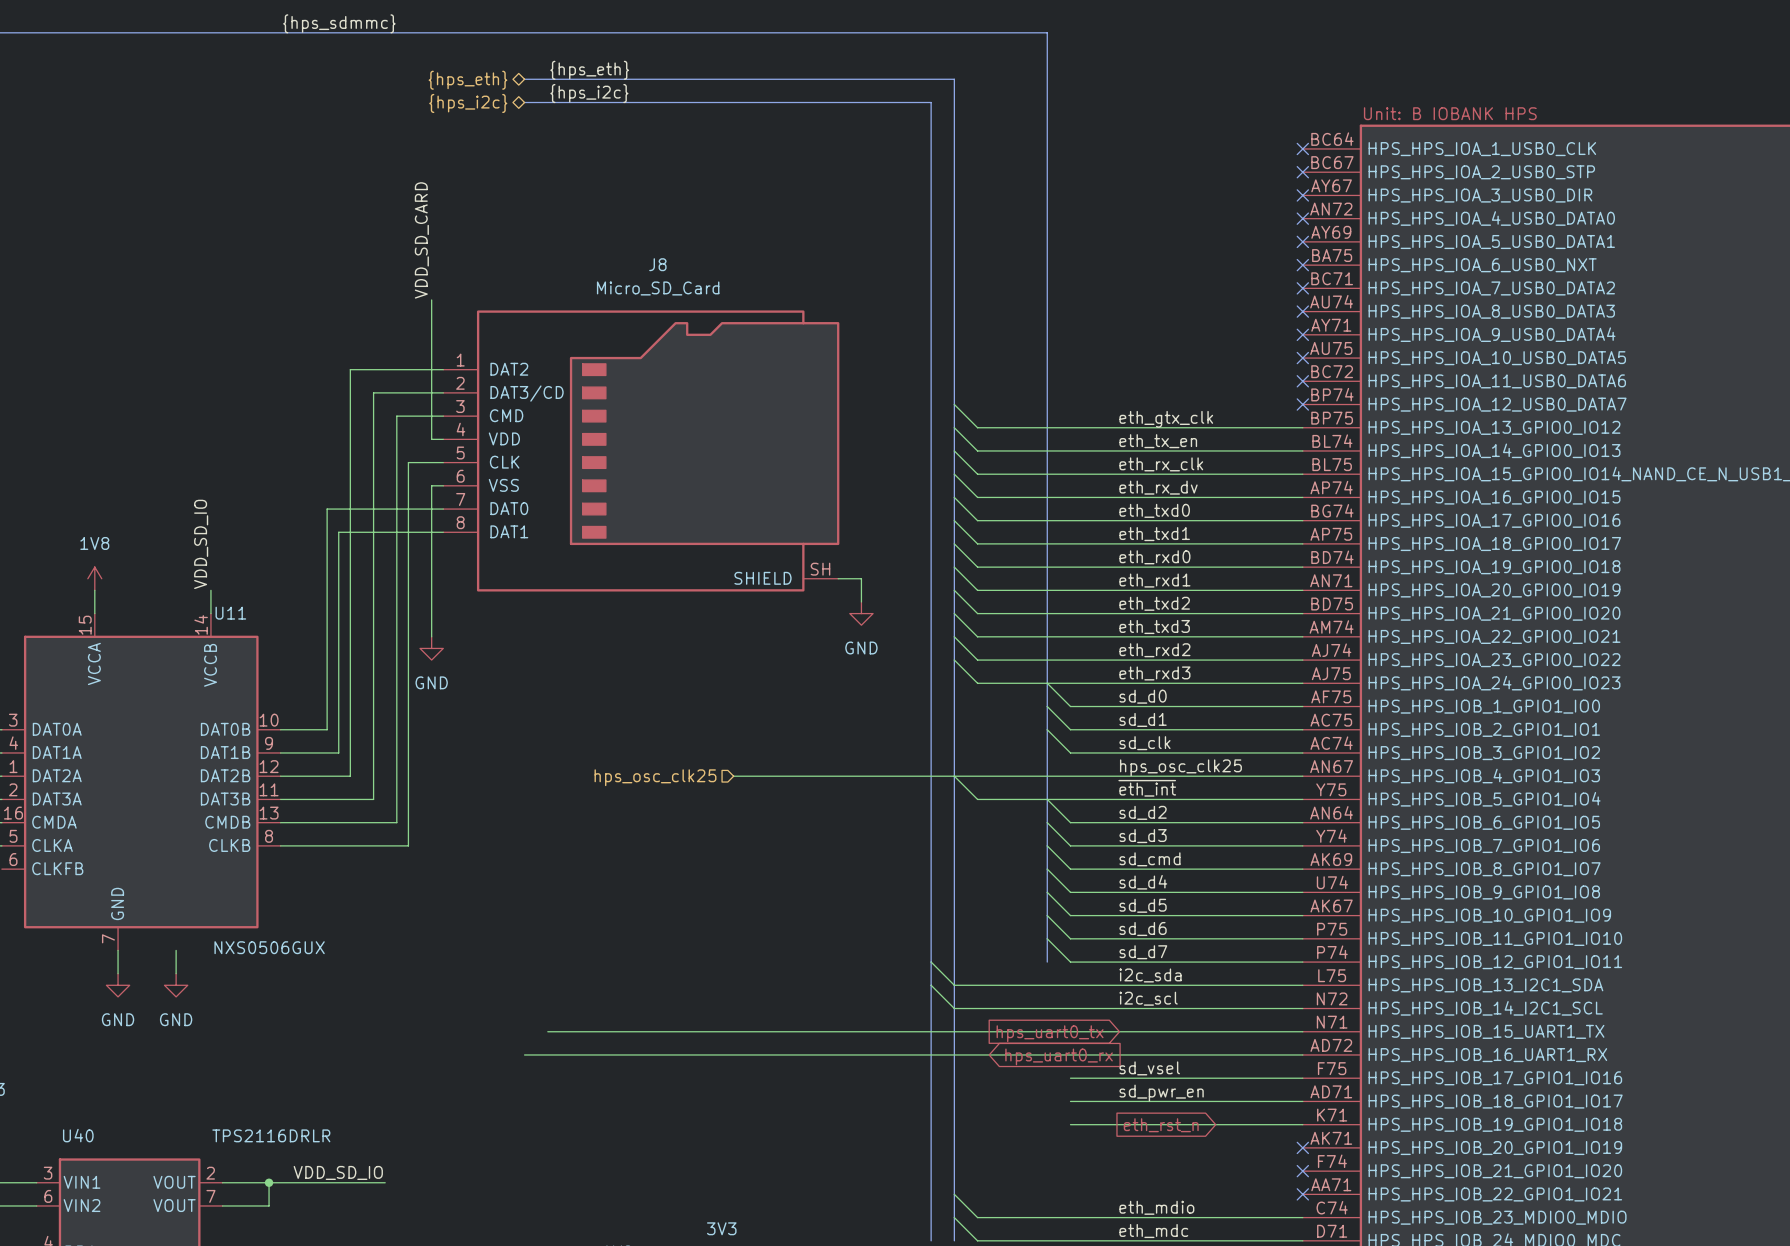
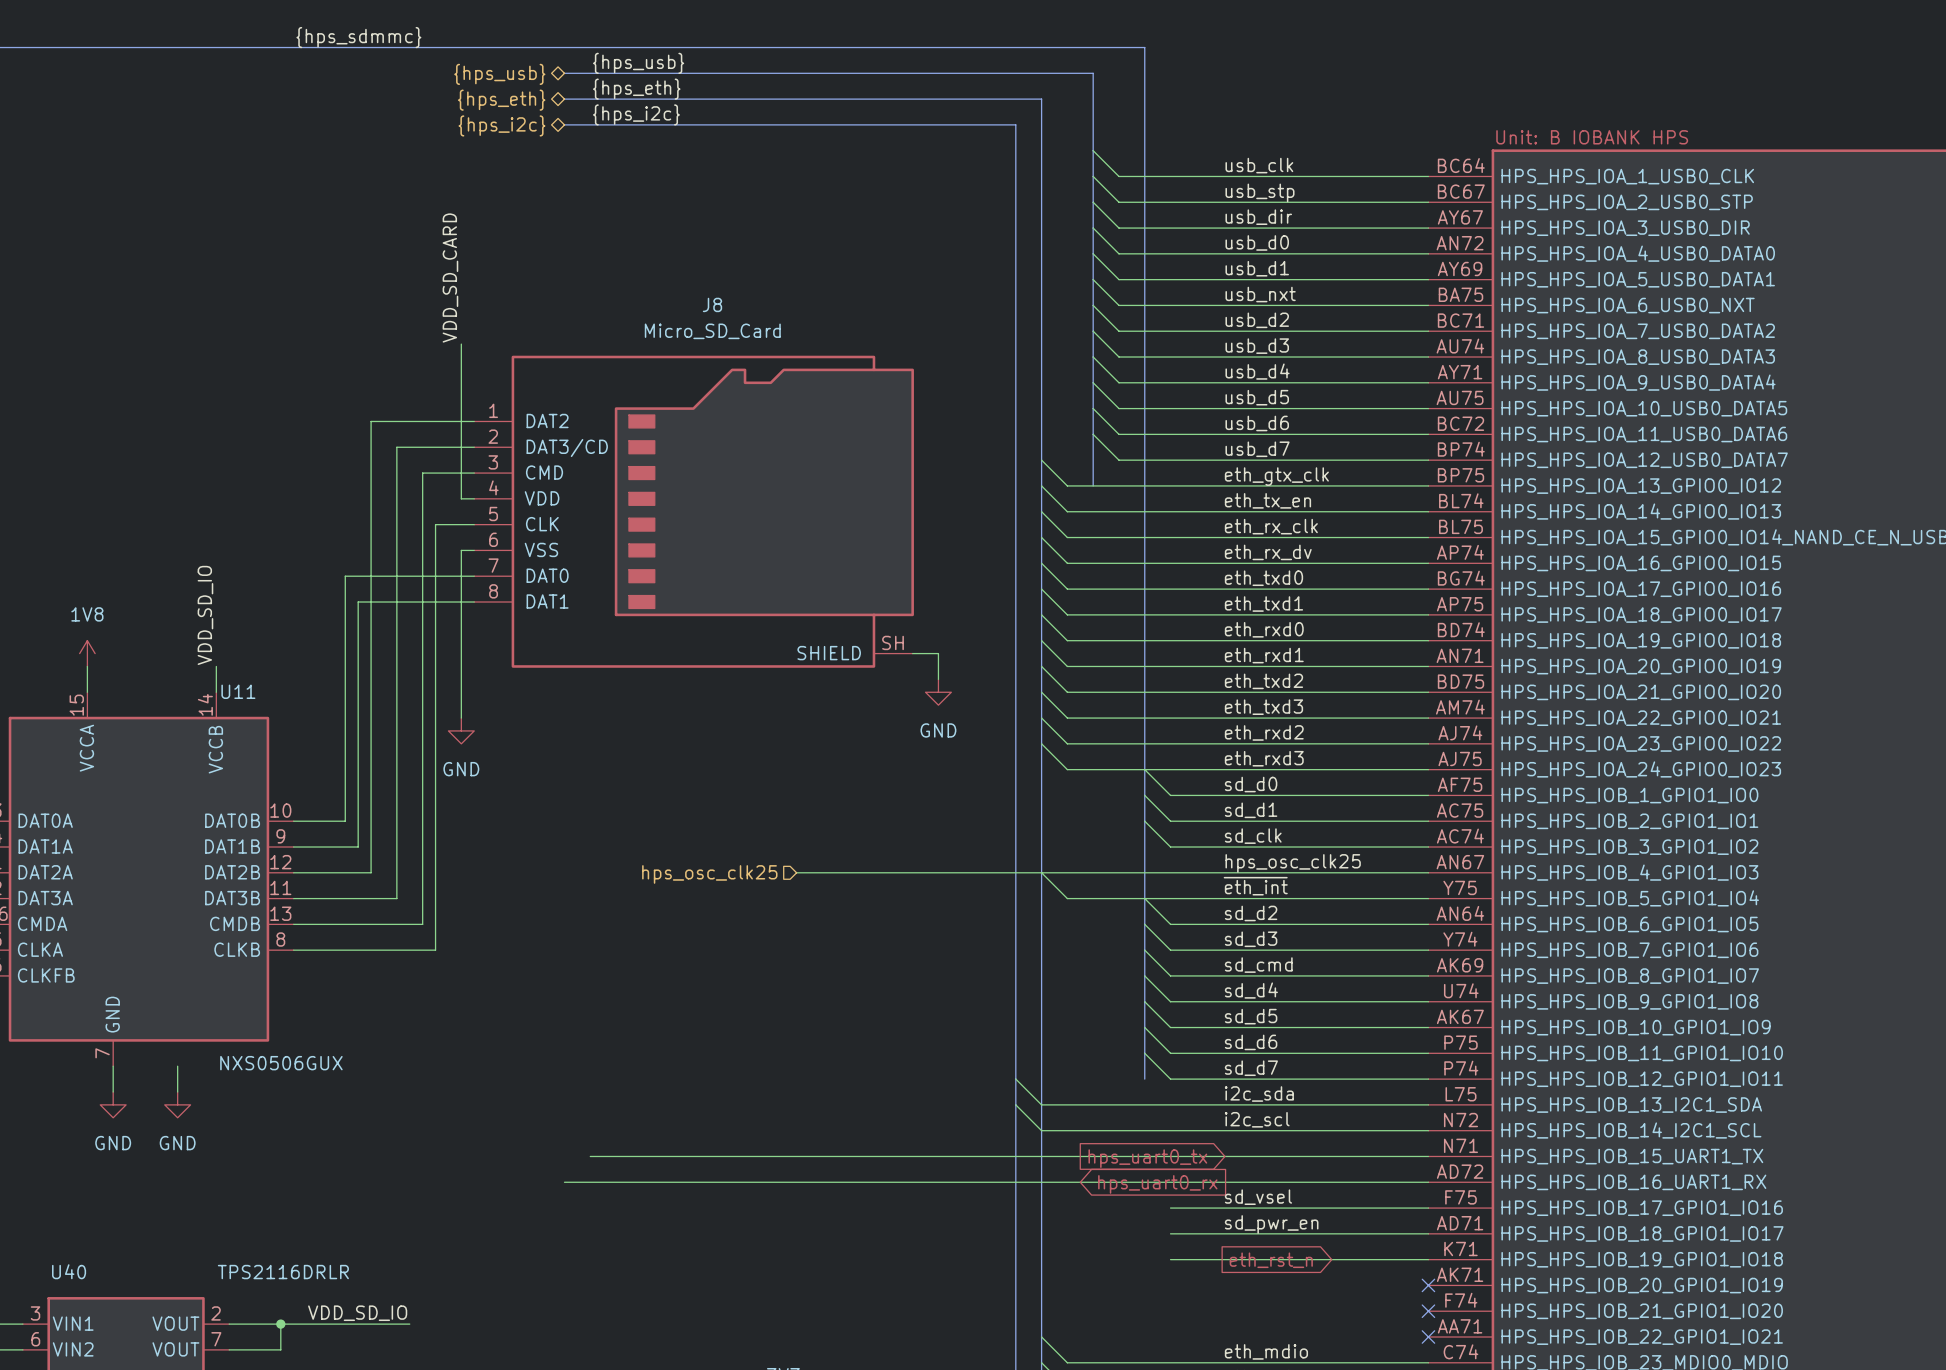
label: none -> {hps_usb} (638, 63)
bus: none -> (564, 73) (1093, 73) (1093, 485)
hierarchical label: none -> {hps_usb} (499, 74)
wire: none -> (1093, 150) (1118, 176) (1428, 176)
label: none -> usb_clk (1259, 165)
wire: none -> (1093, 176) (1118, 202) (1428, 202)
no-connect mark: (1302, 148) -> none
label: none -> usb_stp (1259, 192)
wire: none -> (1093, 202) (1118, 228) (1428, 228)
no-connect mark: (1302, 172) -> none
label: none -> usb_dir (1258, 217)
wire: none -> (1093, 228) (1118, 253) (1428, 253)
no-connect mark: (1302, 195) -> none
label: none -> usb_d0 (1257, 242)
wire: none -> (1093, 253) (1118, 279) (1428, 279)
no-connect mark: (1302, 218) -> none
label: none -> usb_d1 (1257, 268)
wire: none -> (1093, 279) (1118, 305) (1428, 305)
no-connect mark: (1302, 241) -> none
label: none -> usb_nxt (1260, 294)
wire: none -> (1093, 305) (1118, 331) (1428, 331)
no-connect mark: (1302, 265) -> none
label: none -> usb_d2 (1257, 320)
wire: none -> (1093, 331) (1118, 357) (1428, 357)
no-connect mark: (1302, 288) -> none
label: none -> usb_d3 (1257, 346)
wire: none -> (1093, 357) (1118, 382) (1428, 382)
no-connect mark: (1302, 311) -> none
label: none -> usb_d4 (1257, 371)
wire: none -> (1093, 382) (1118, 408) (1428, 408)
no-connect mark: (1302, 334) -> none
label: none -> usb_d5 (1257, 397)
wire: none -> (1093, 408) (1118, 434) (1428, 434)
no-connect mark: (1302, 358) -> none
label: none -> usb_d6 (1257, 423)
wire: none -> (1093, 434) (1118, 460) (1428, 460)
no-connect mark: (1302, 381) -> none
label: none -> usb_d7 (1257, 449)
no-connect mark: (1302, 404) -> none

